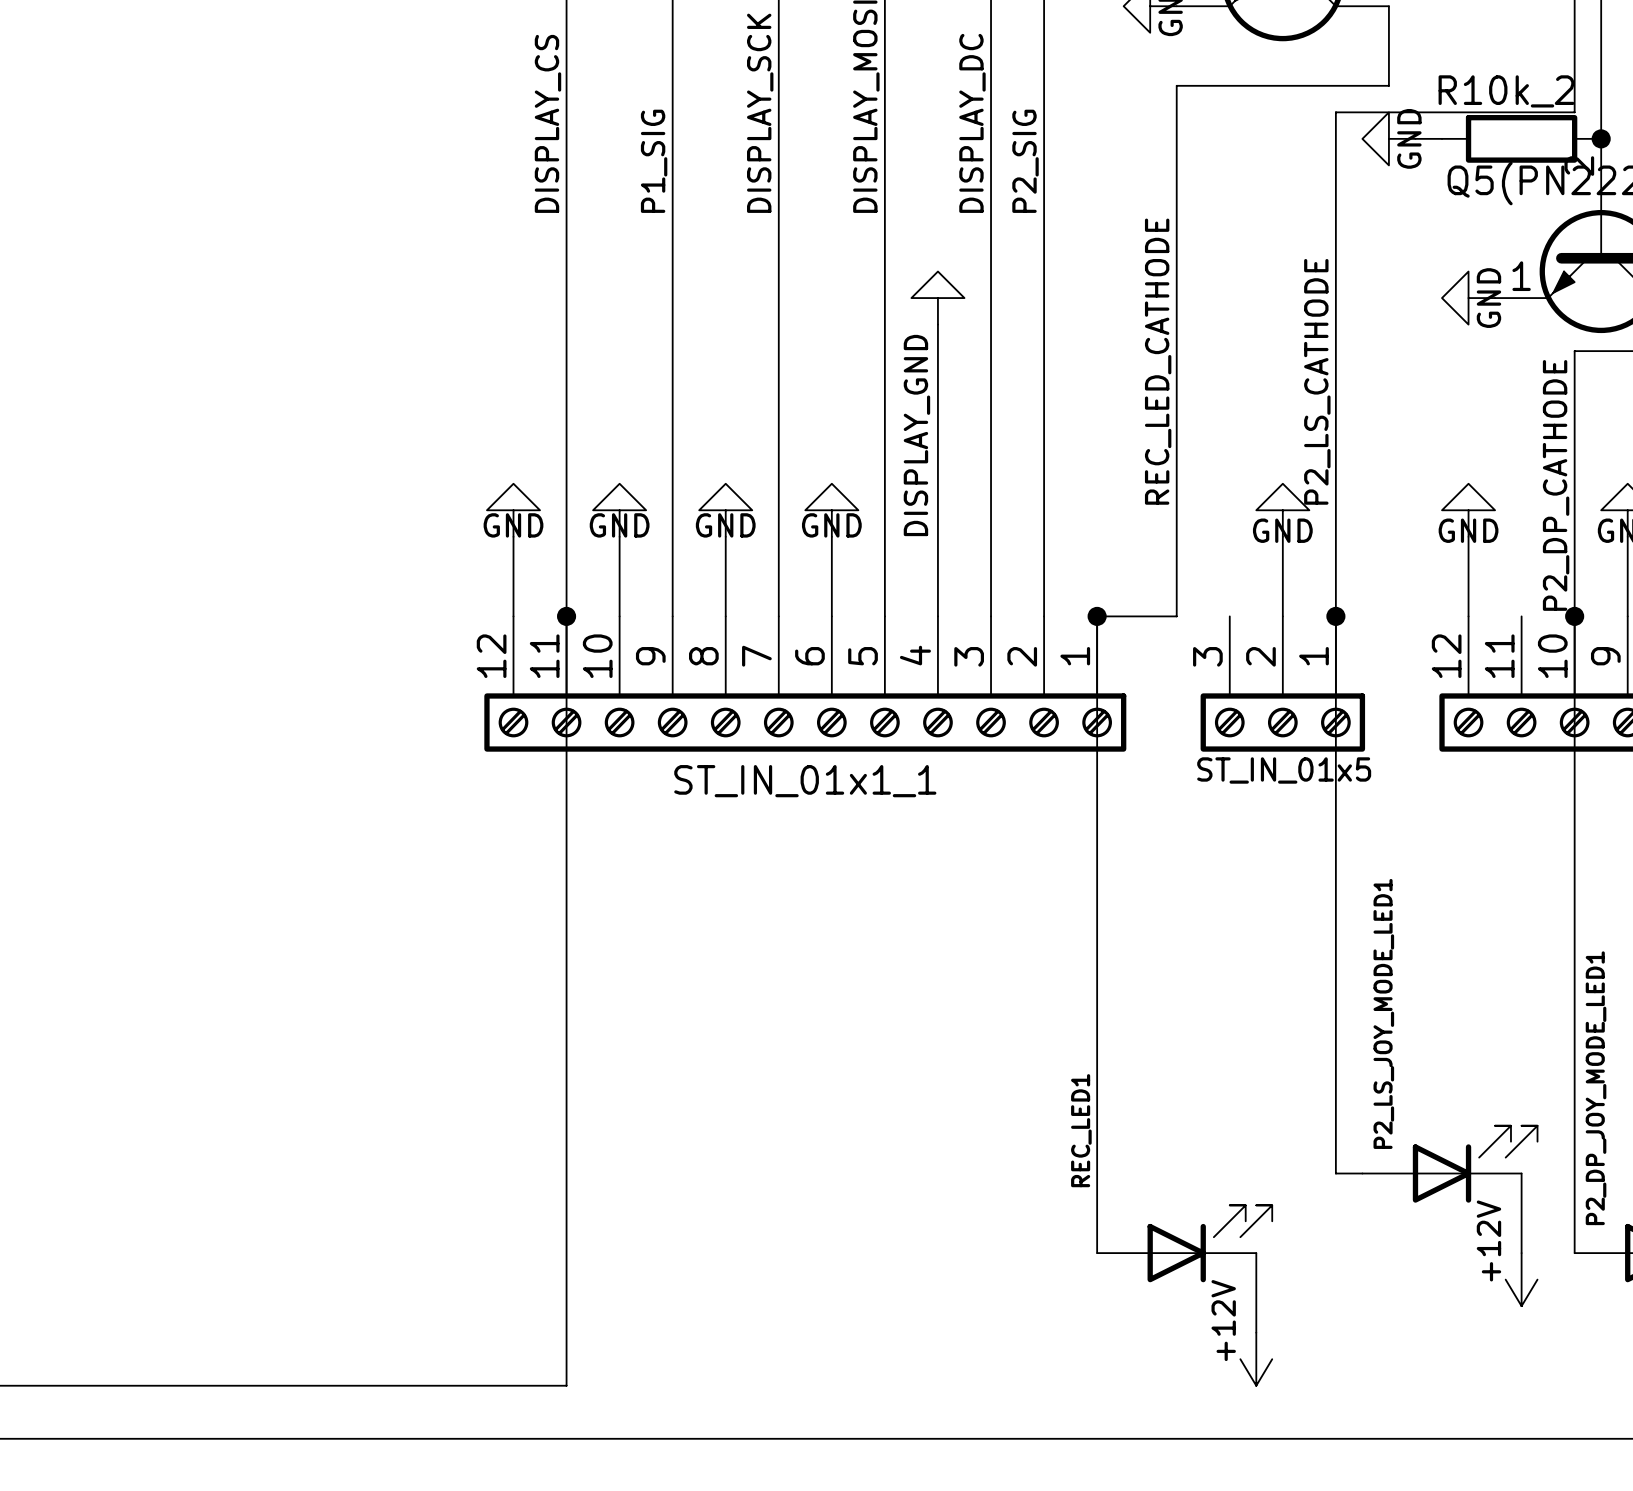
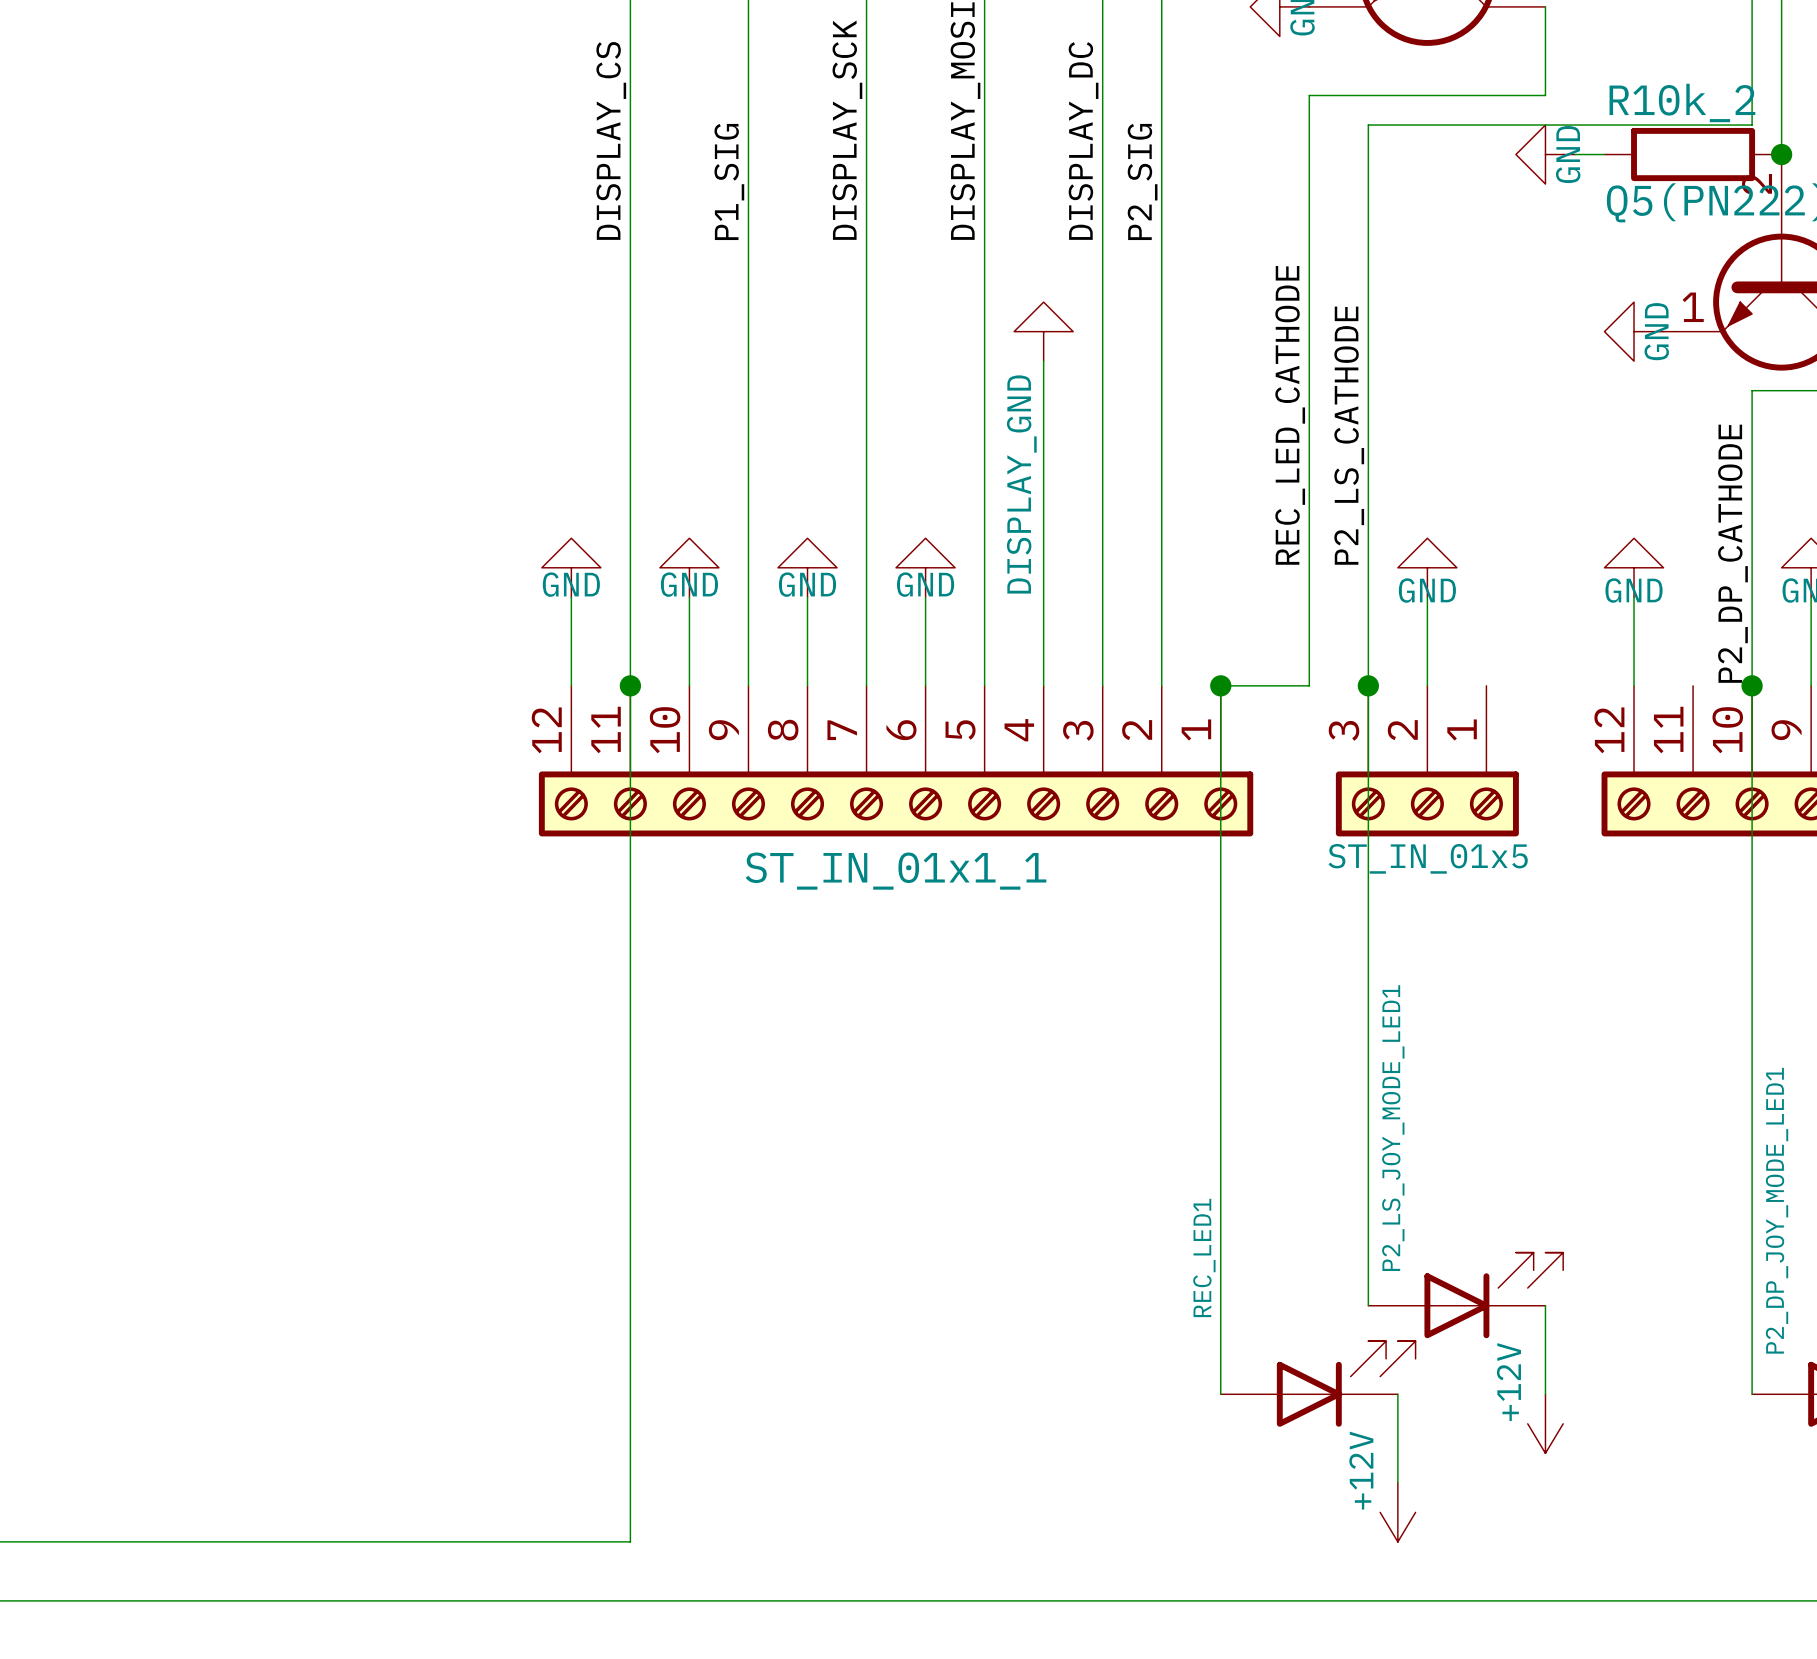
wire: (1335, 112) (1335, 1173) (1362, 1173) -> (1486, 125) (1368, 125) (1368, 1305)
label position: P2_LS_CATHODE (1317, 381) -> P2_LS_CATHODE (1349, 435)
junction position: (1335, 616) -> (1368, 685)
P2_LS_JOY_MODE_LED1 position: (1449, 1164) -> (1465, 1295)
wire: (1521, 1173) (1521, 1253) -> (1545, 1305) (1545, 1394)
power symbol position: +12V (1521, 1279) -> +12V (1545, 1423)

